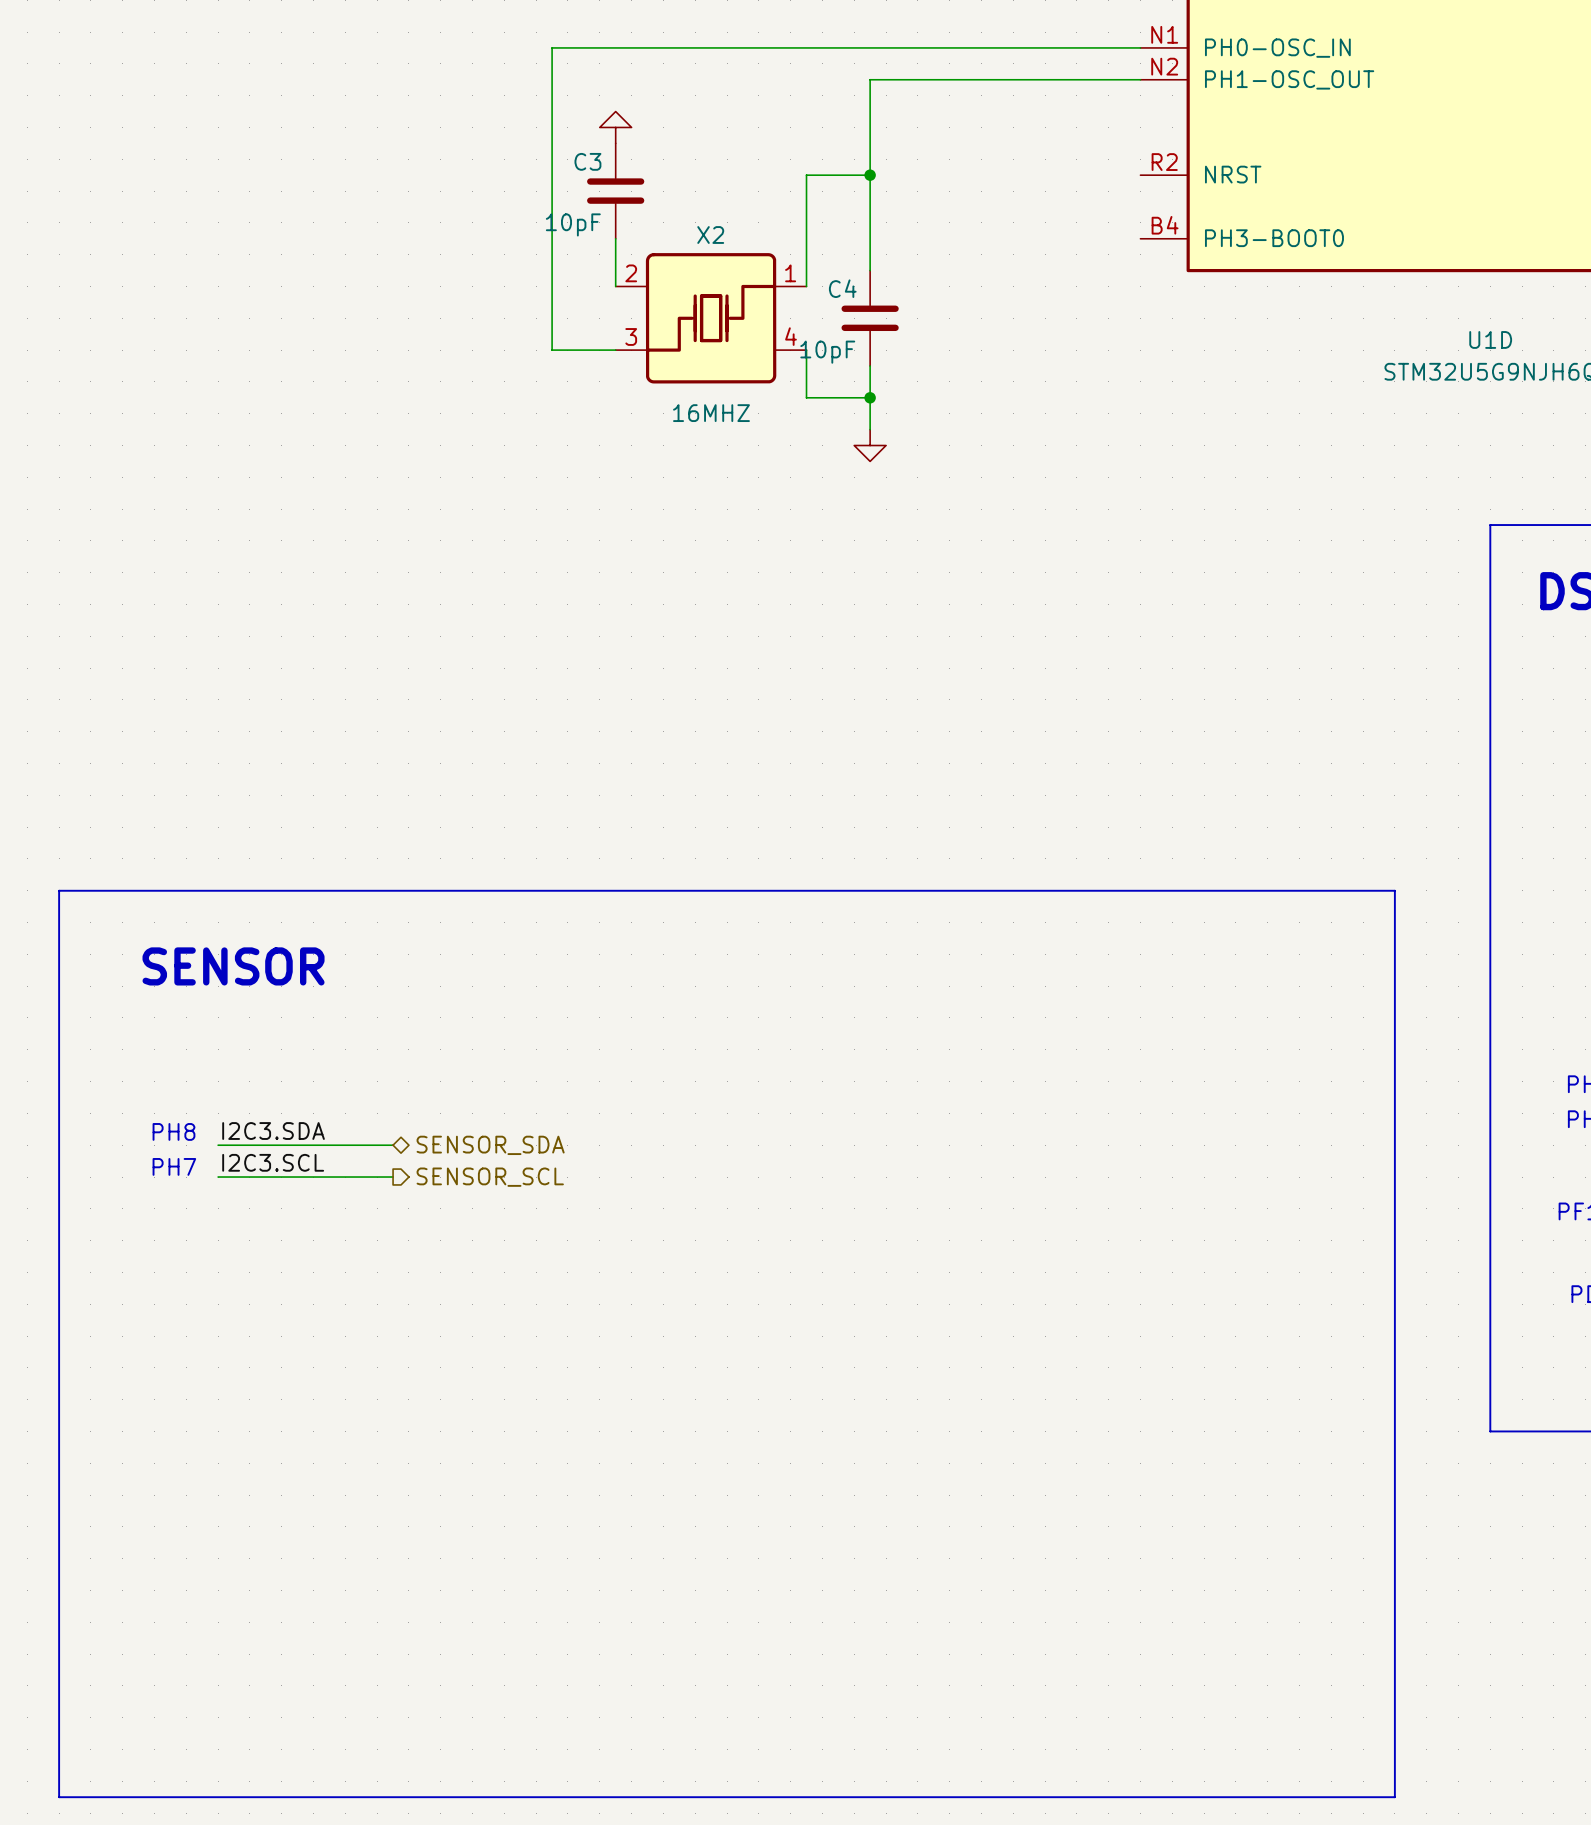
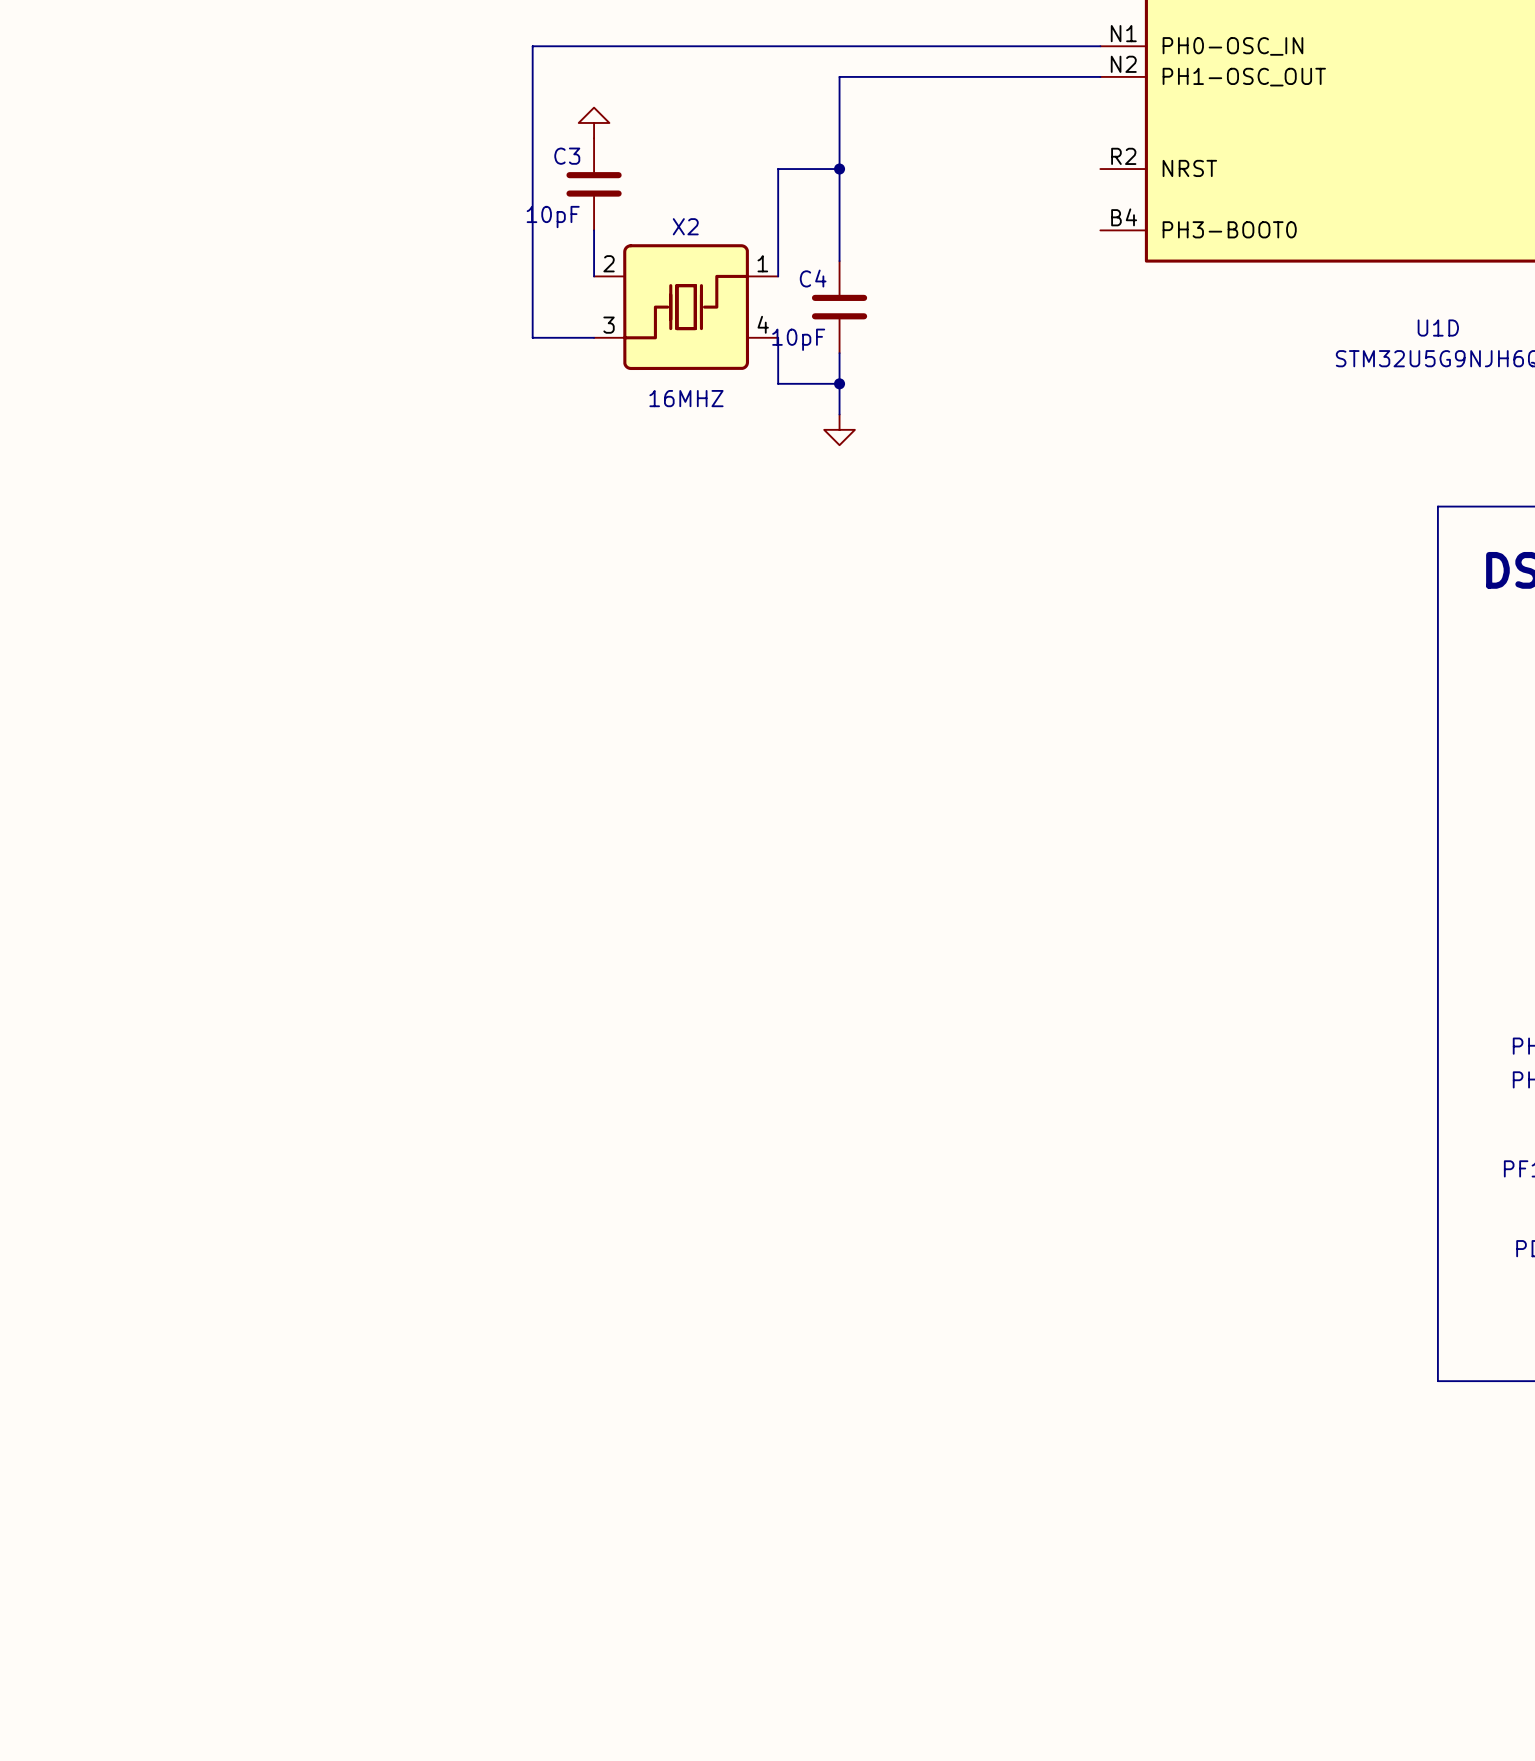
line: (59, 890) (1394, 890) (1394, 1797) (59, 1797) (59, 890) -> none
text: SENSOR (233, 966) -> none
text: PH8 (173, 1131) -> none
label: I2C3.SDA (273, 1131) -> none
wire: (218, 1145) (393, 1145) -> none
hierarchical label: SENSOR_SDA (490, 1145) -> none
label: I2C3.SCL (273, 1162) -> none
text: PH7 (174, 1166) -> none
wire: (218, 1177) (393, 1177) -> none
hierarchical label: SENSOR_SCL (490, 1177) -> none

